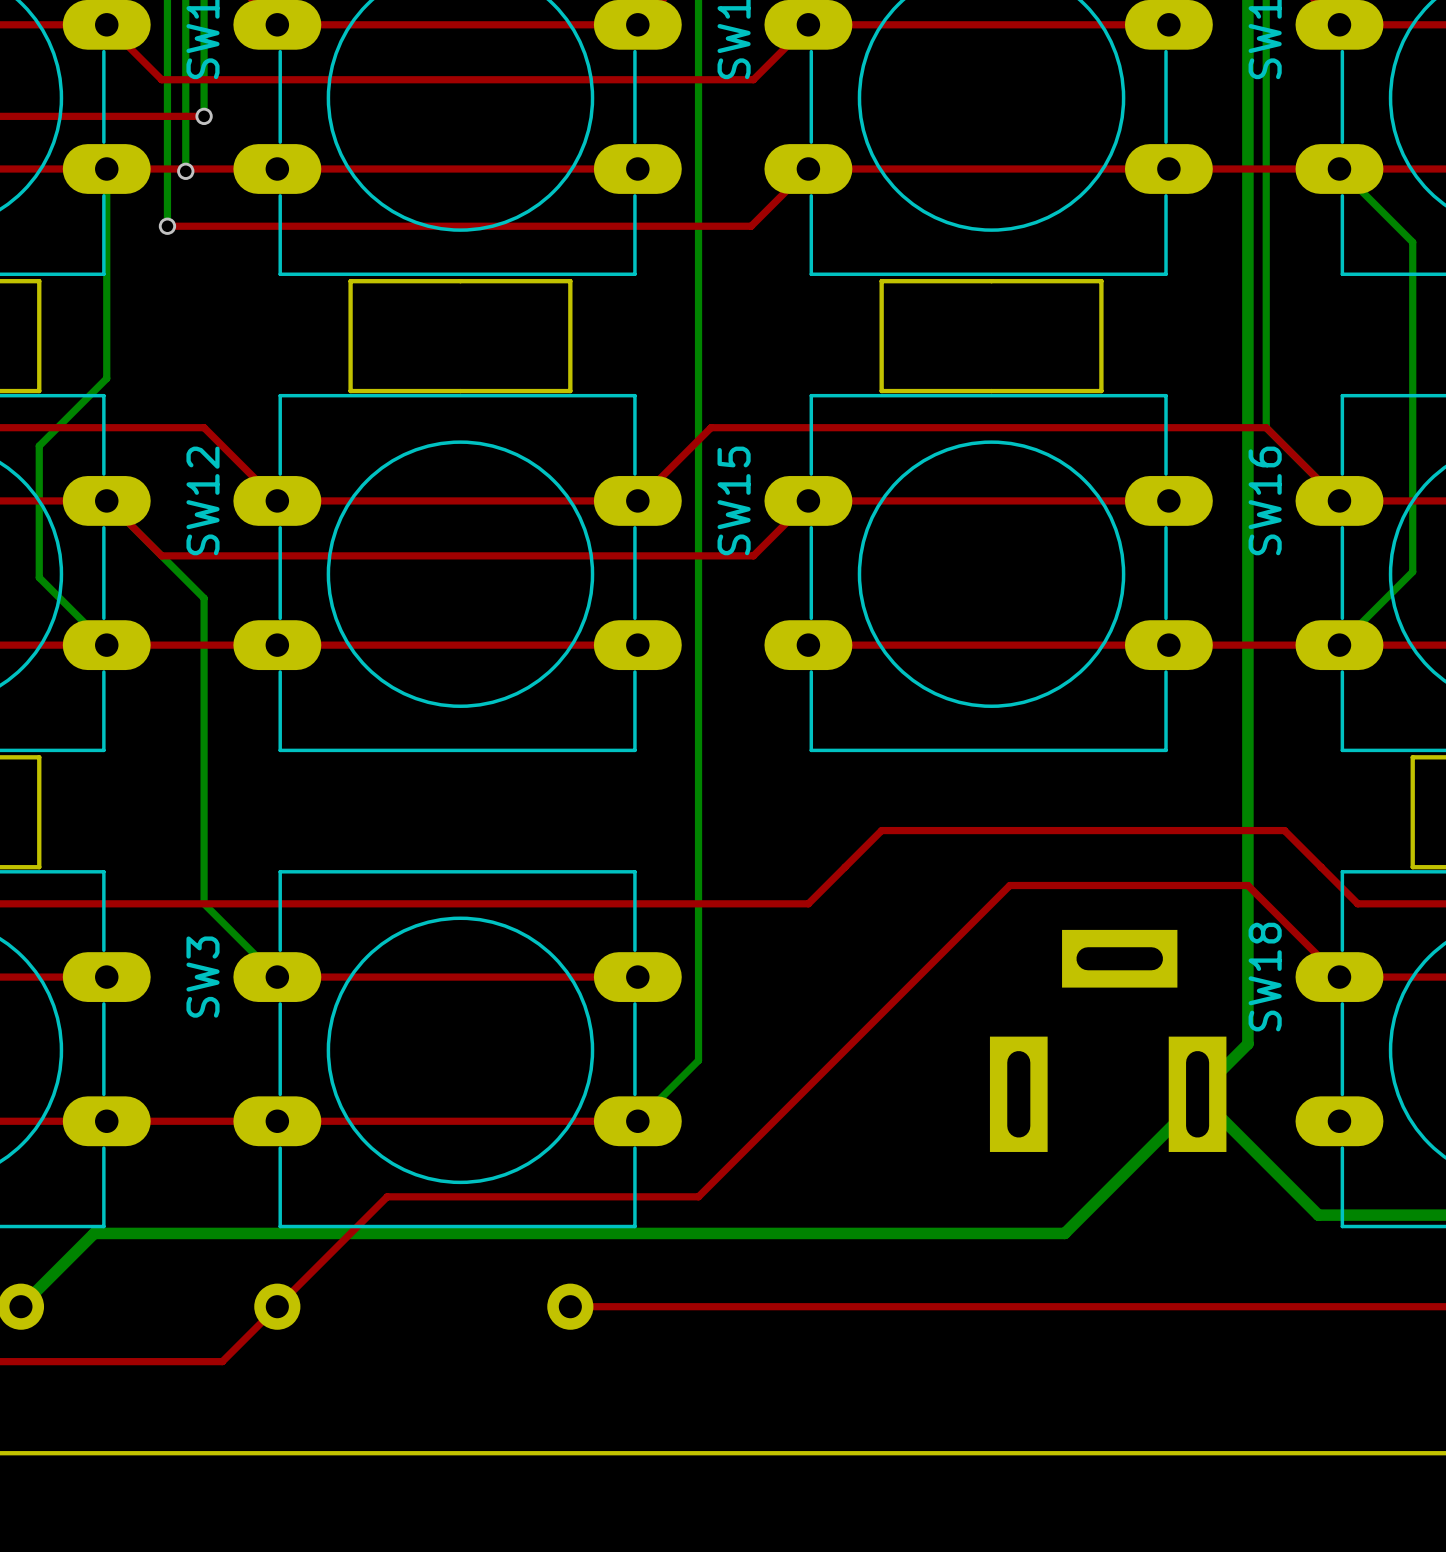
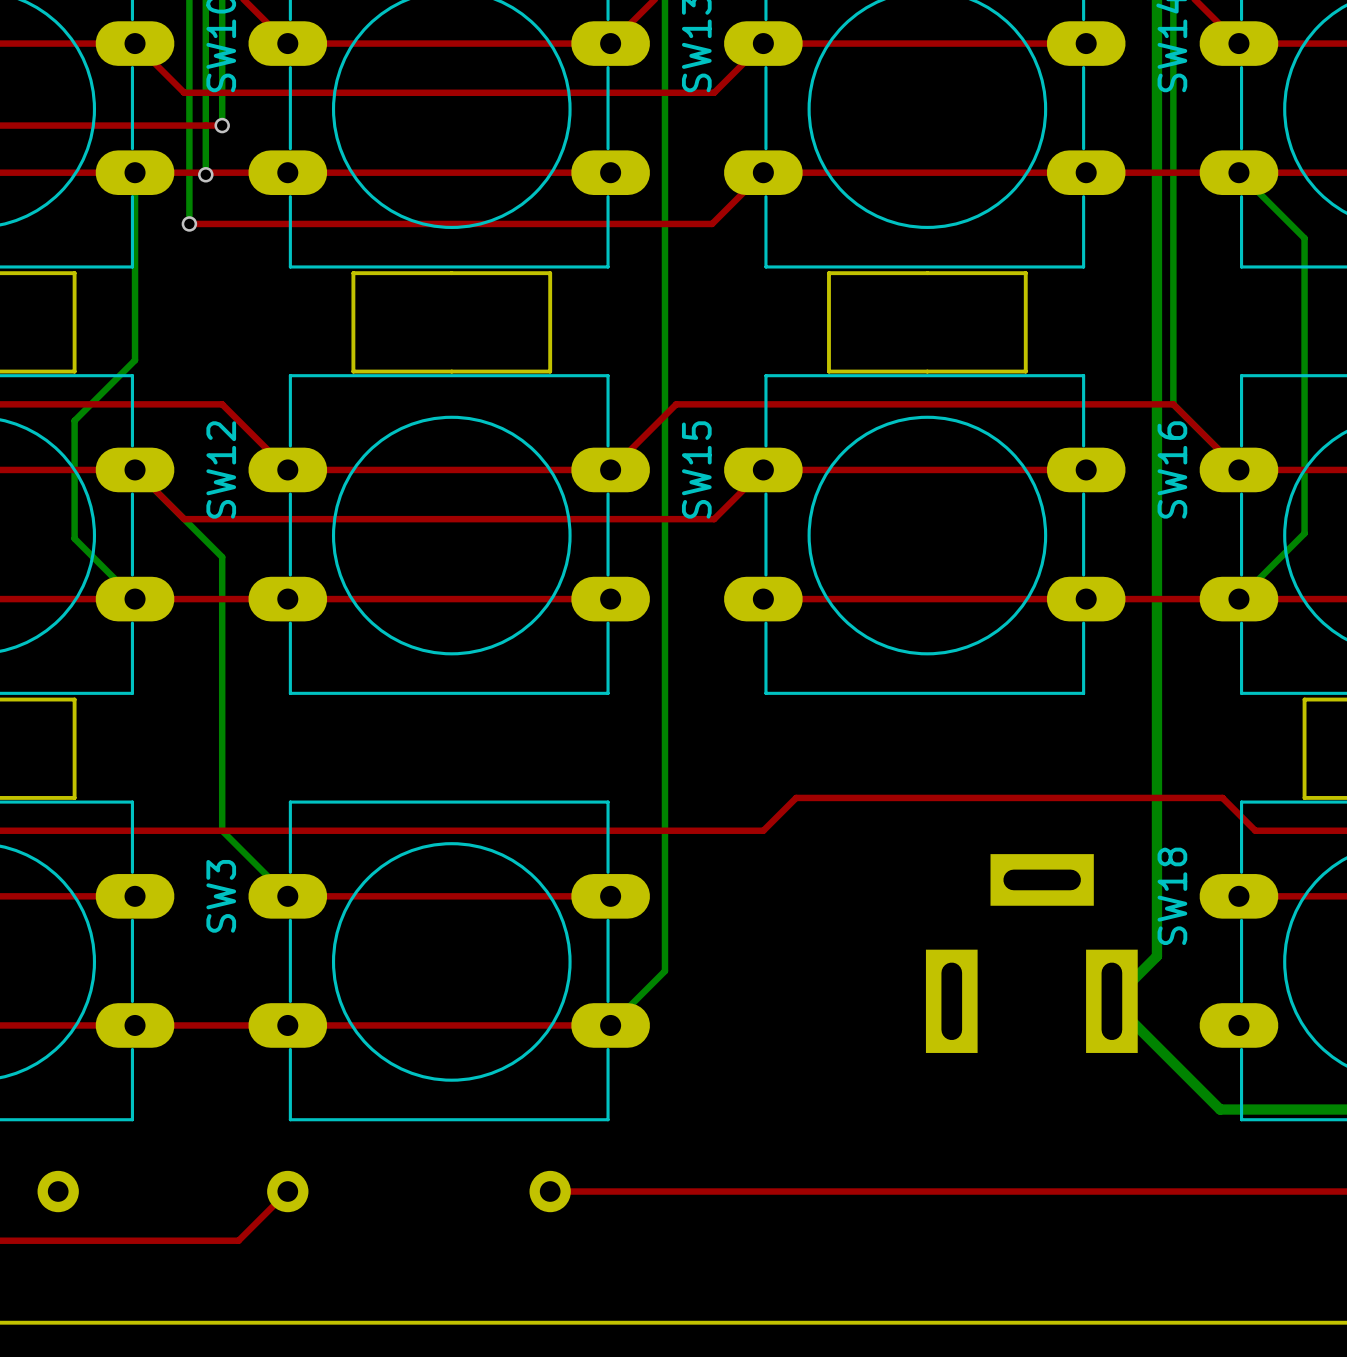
top track: (845, 867) (881, 830) (1284, 830) (1321, 867) -> (796, 797) (1222, 797)
top track: (1339, 977) (1247, 885) (1009, 885) (698, 1196) (387, 1196) (277, 1306) -> none
bottom track: (1197, 1094) (1197, 1100) (1064, 1233) (94, 1233) (20, 1306) -> none

